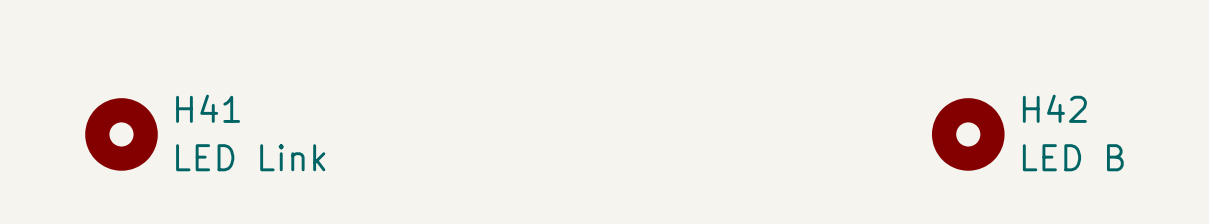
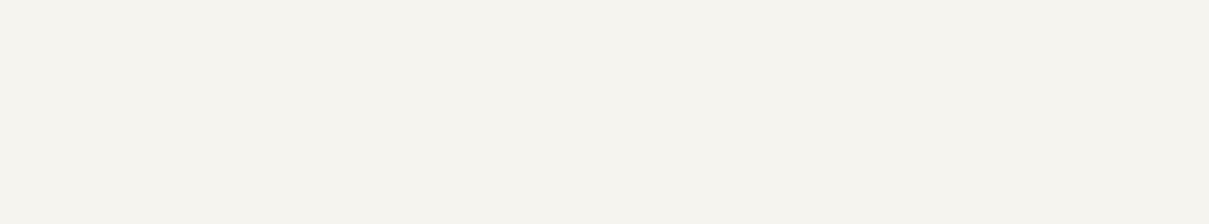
H41: LED Link (121, 134) -> none
H42: LED B (968, 134) -> none

